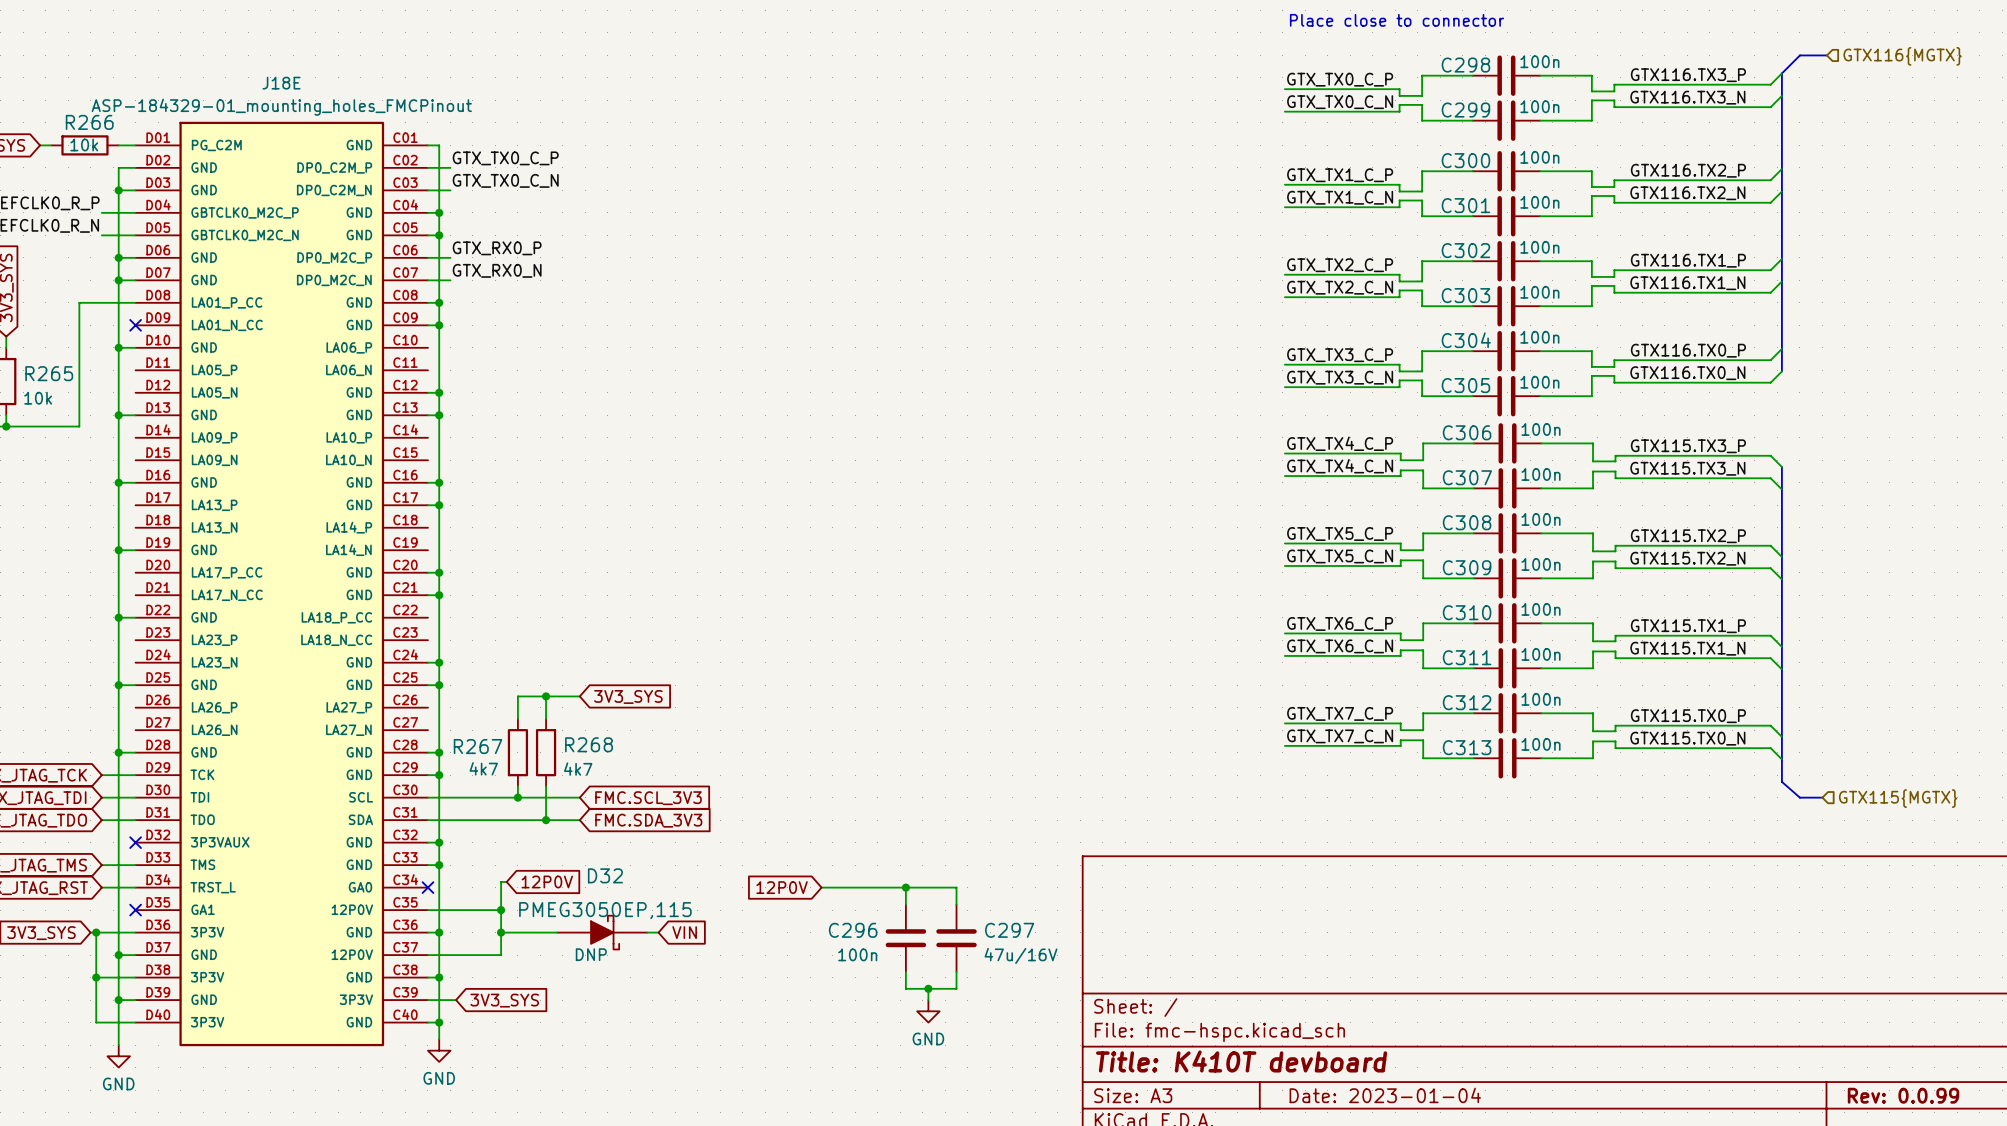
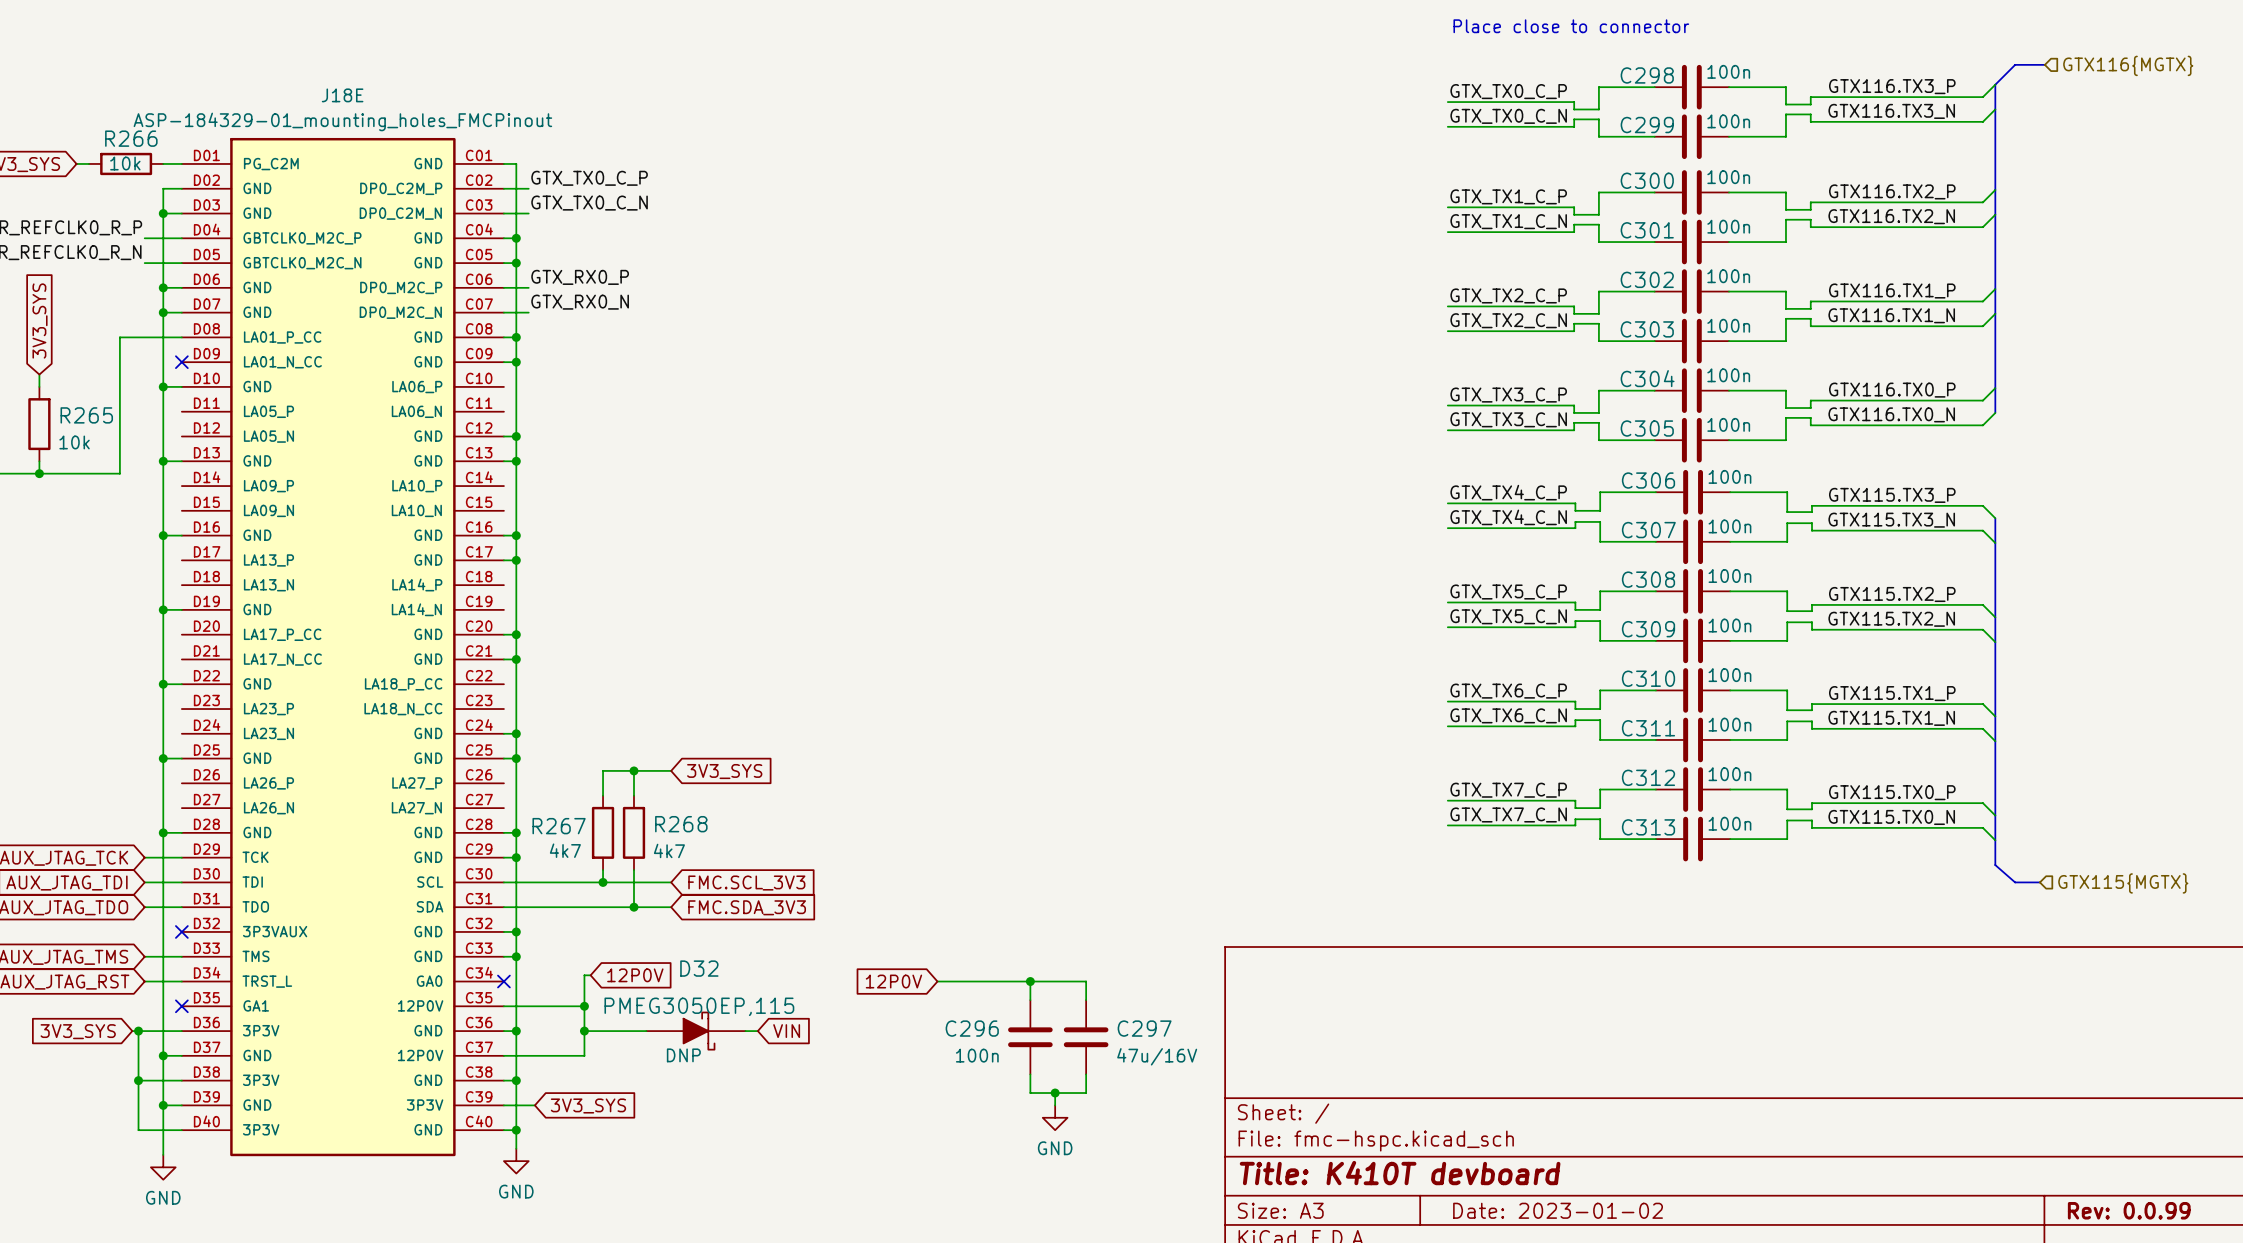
title block: Date: 2023-01-04 (1385, 1095) -> Date: 2023-01-02 (1558, 1210)

